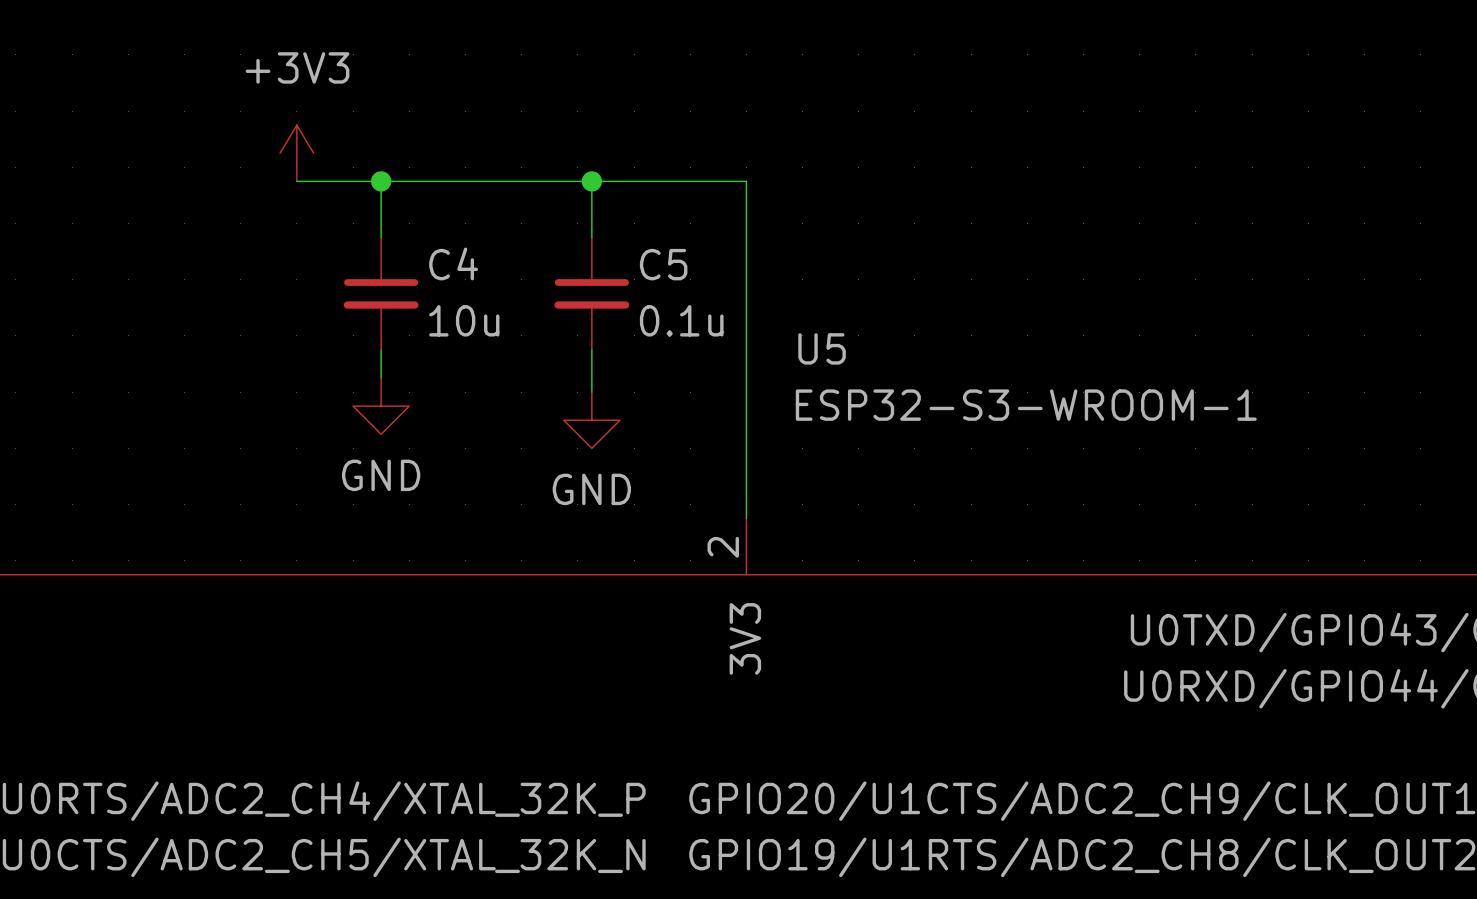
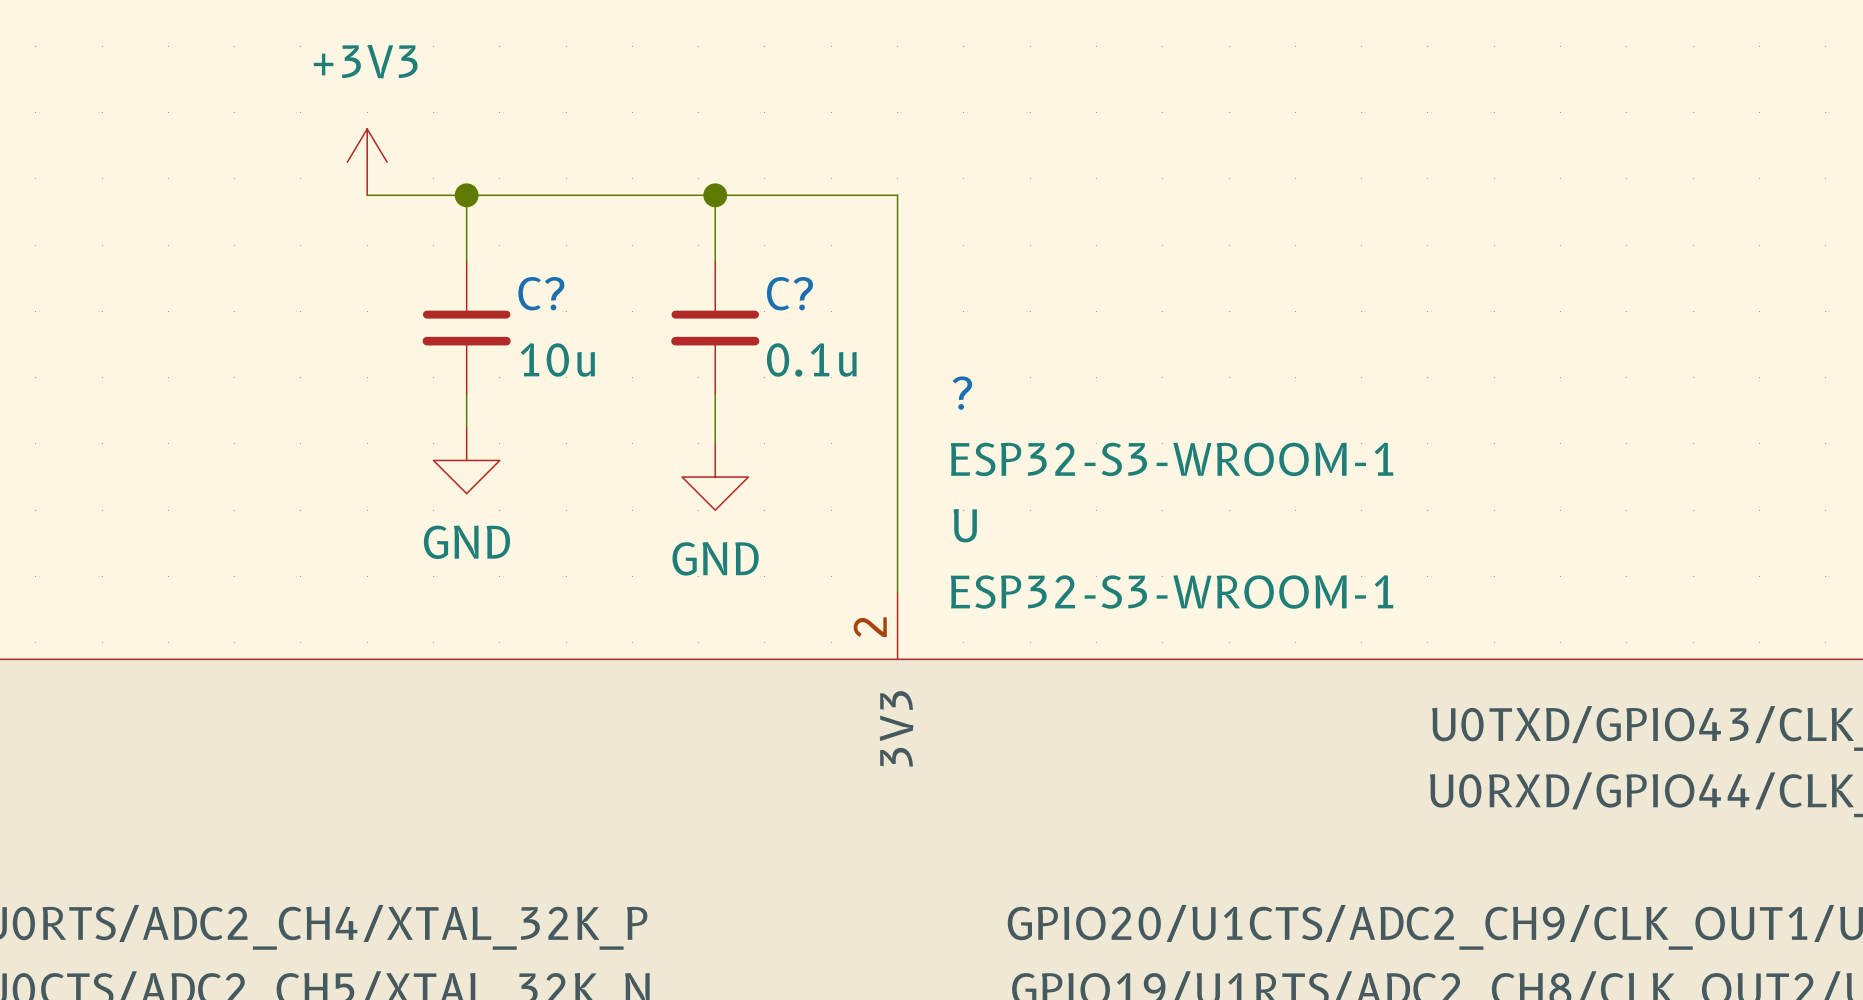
C4 name: C4 (453, 263) -> C? (541, 293)
C5 name: C5 (663, 264) -> C? (789, 293)
U5 name: U5 (822, 348) -> ? (962, 393)
U5 text: none -> U (965, 525)
U5 text: none -> ESP32-S3-WROOM-1 (1172, 591)

